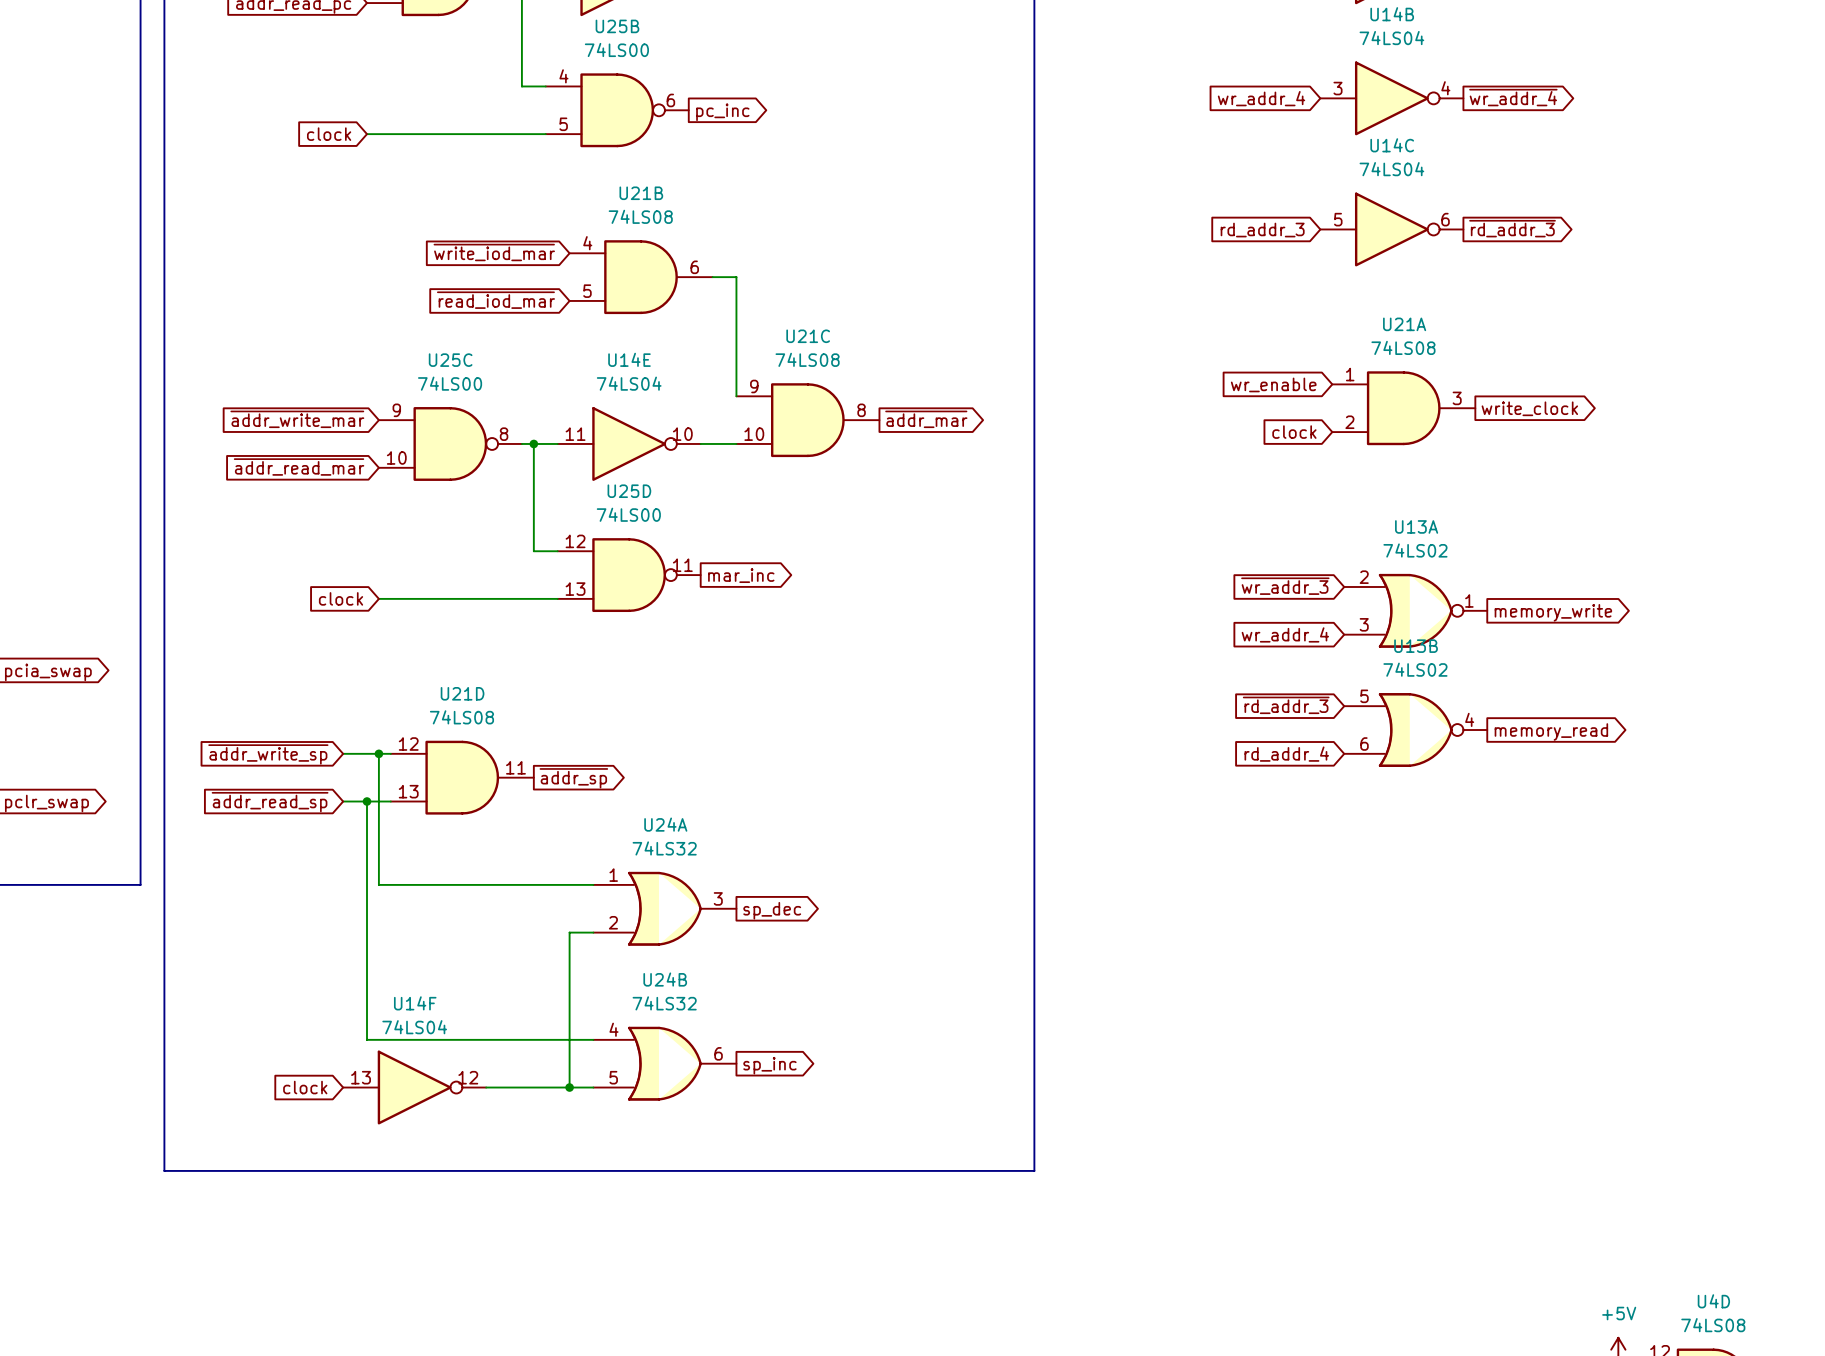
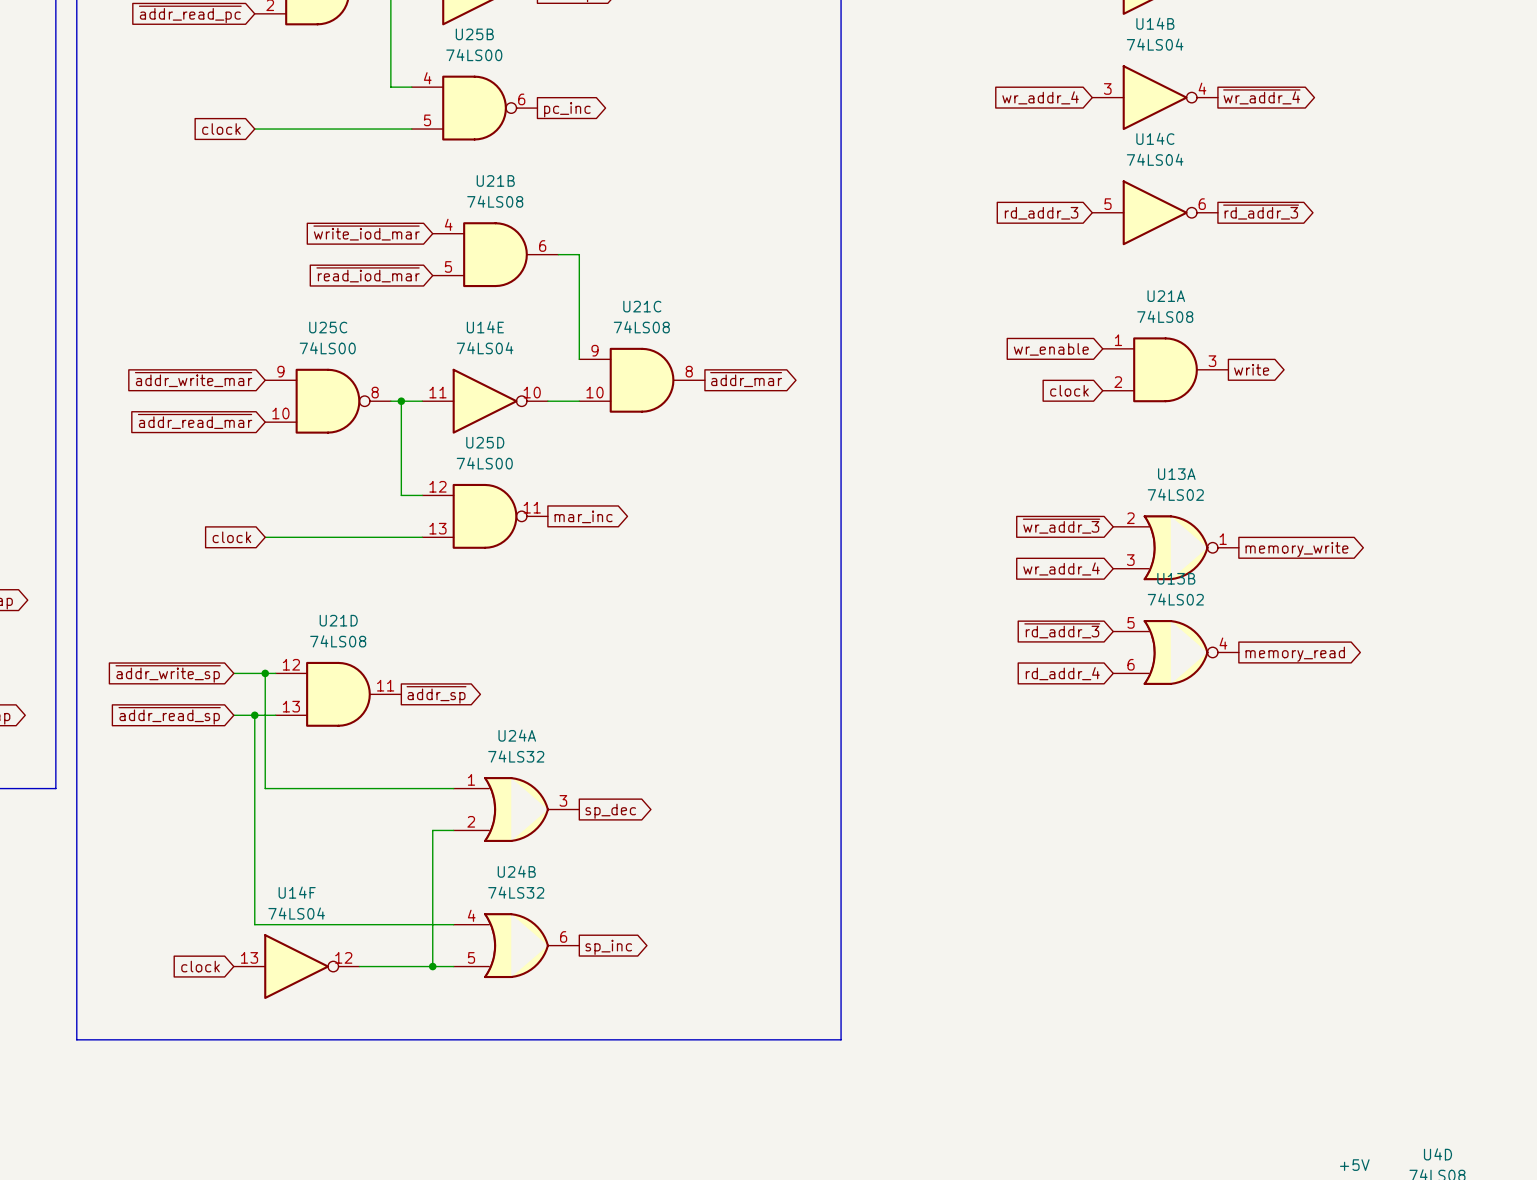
global label: write_clock (1529, 408) -> write (1251, 369)

